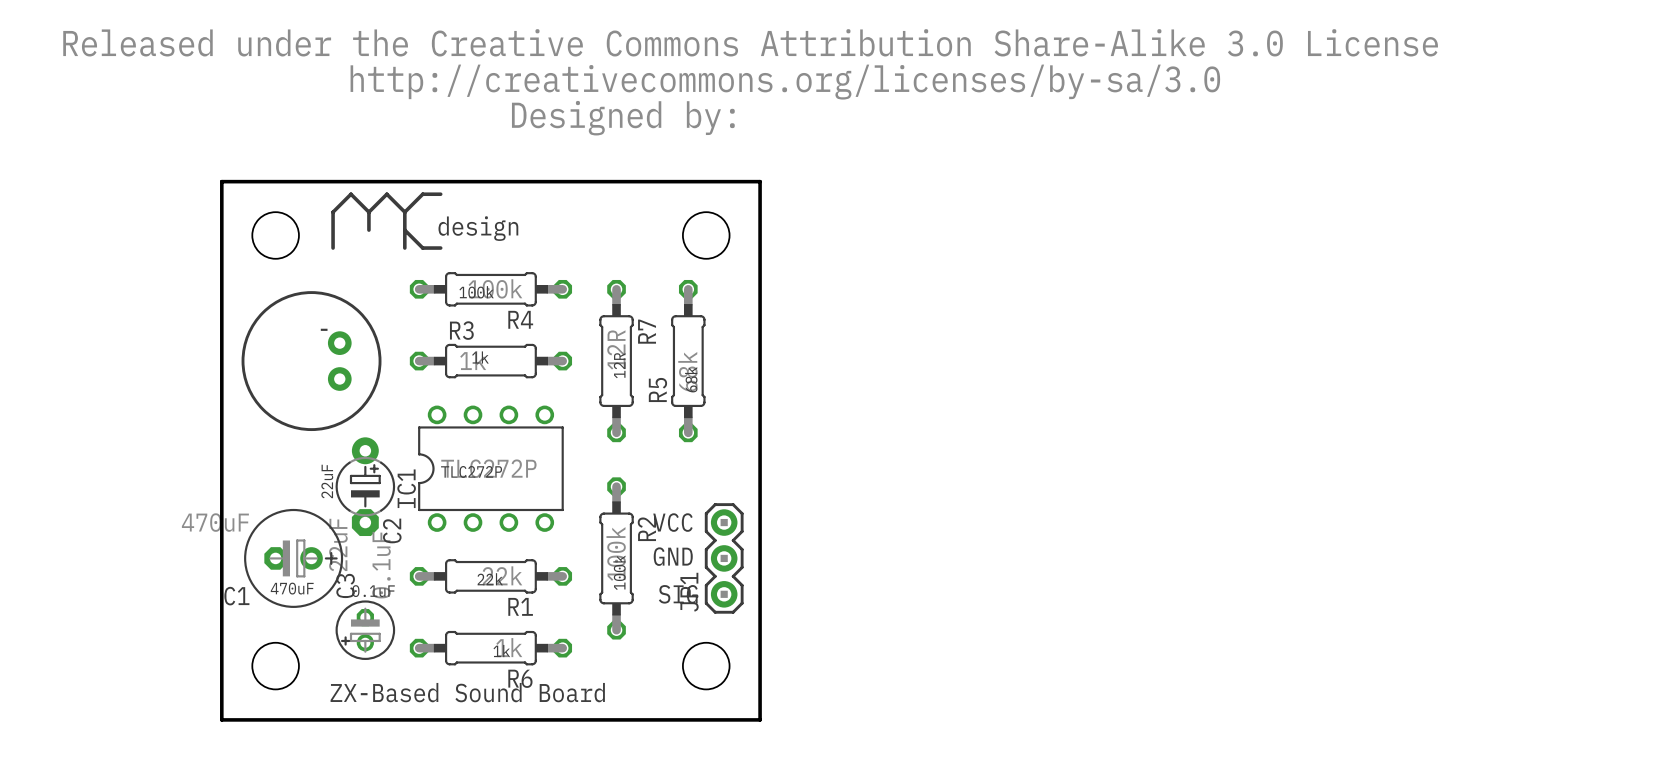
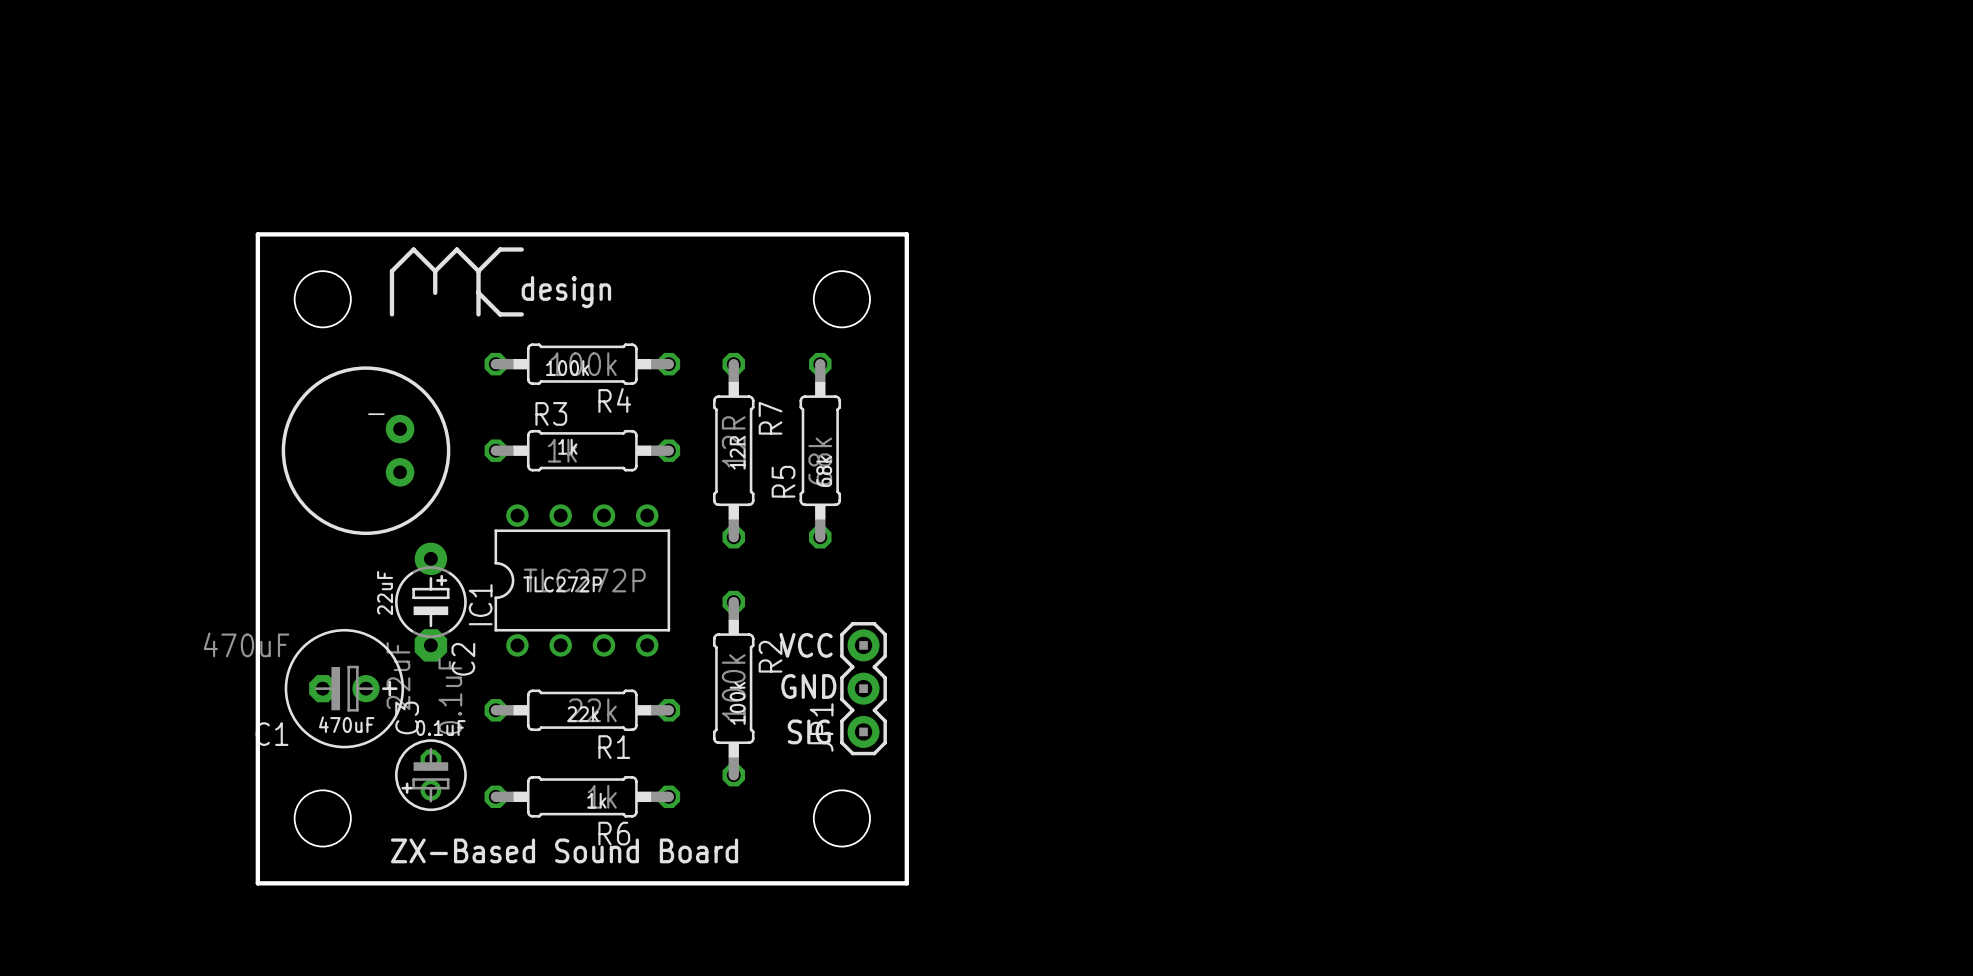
drawing: [63, 29, 1438, 136] -> none

